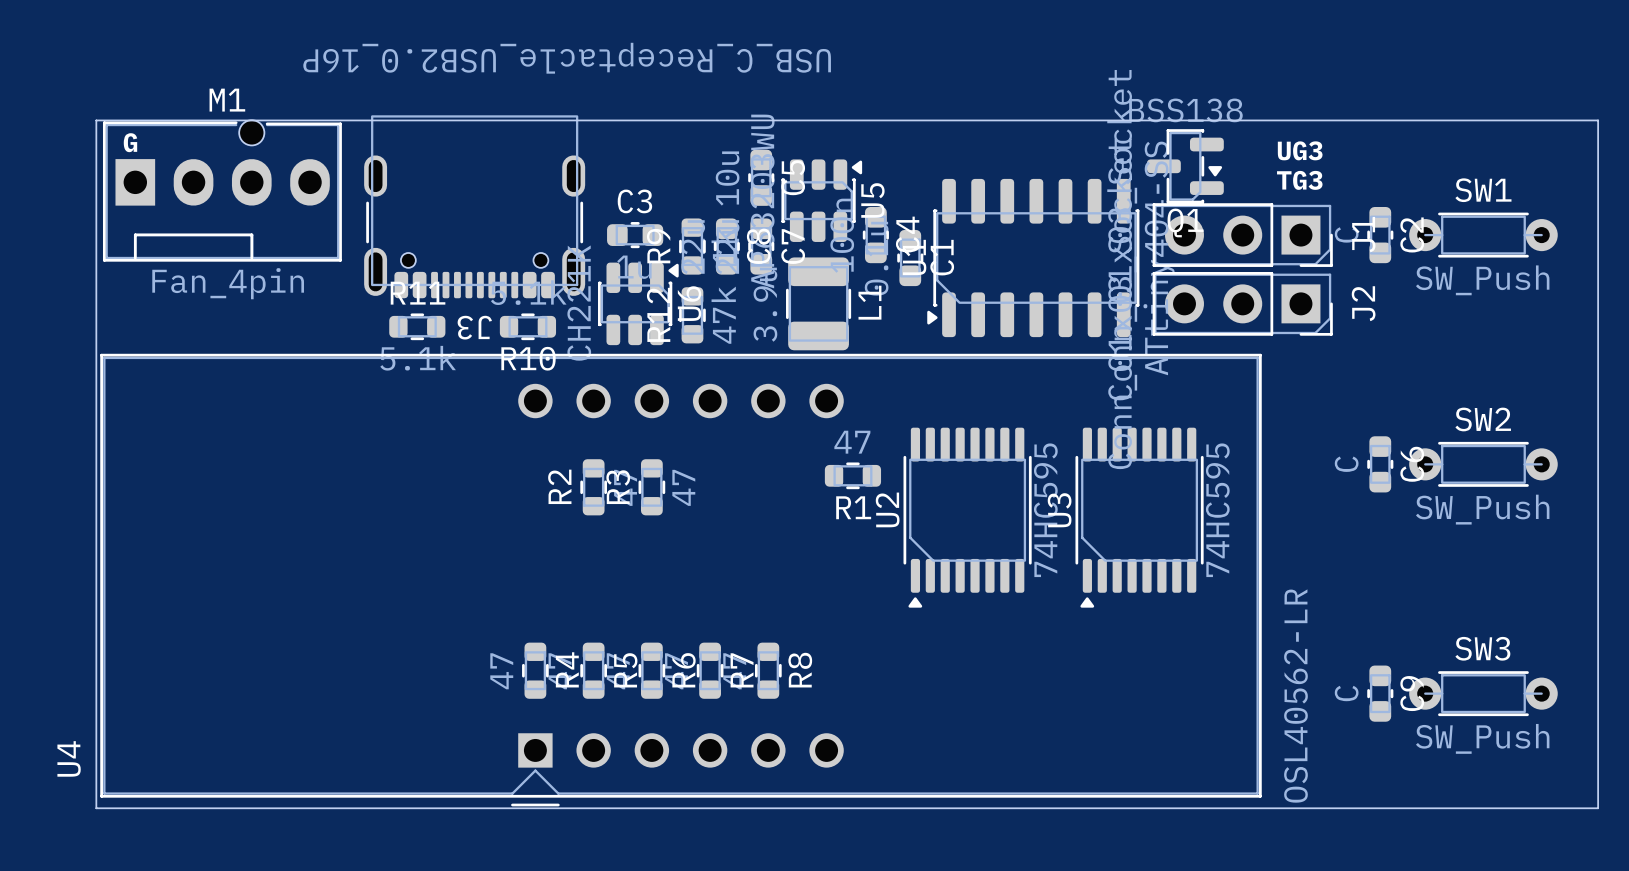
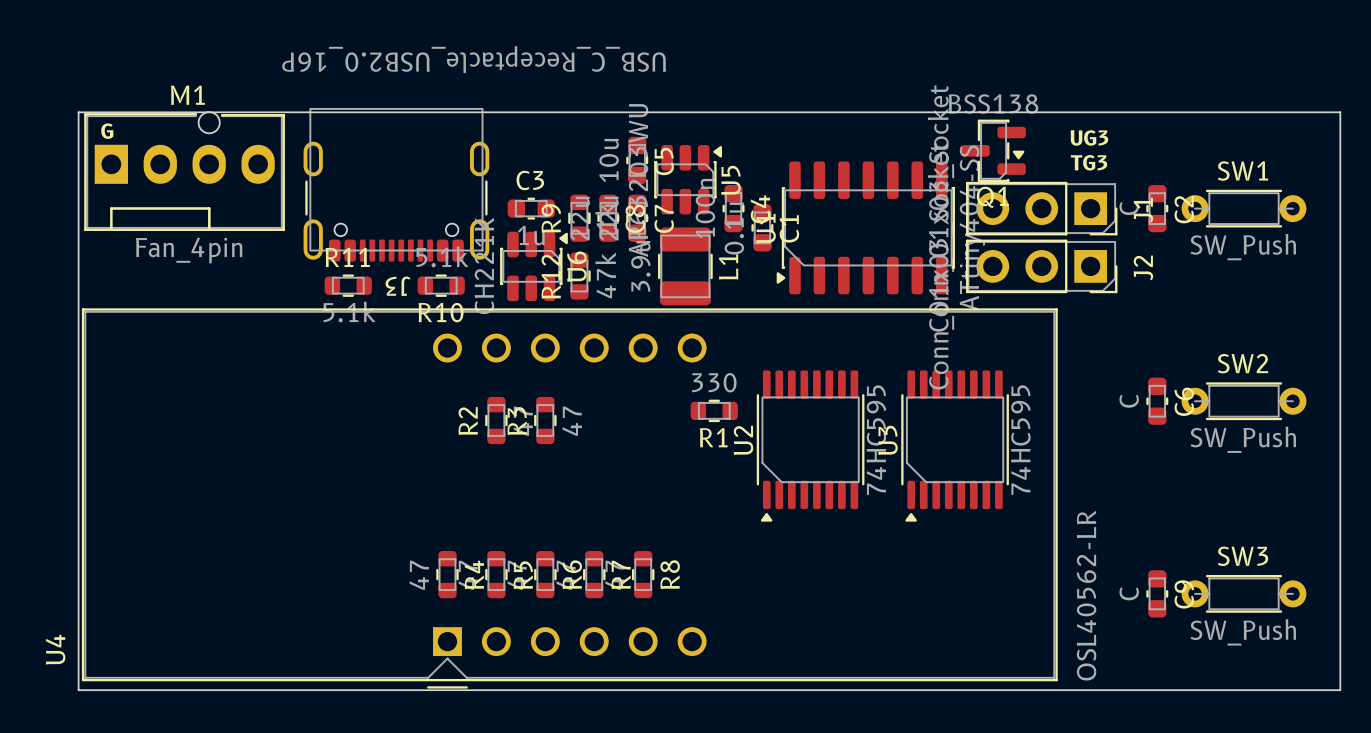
R1 value: 47 (852, 442) -> 330 (714, 382)

